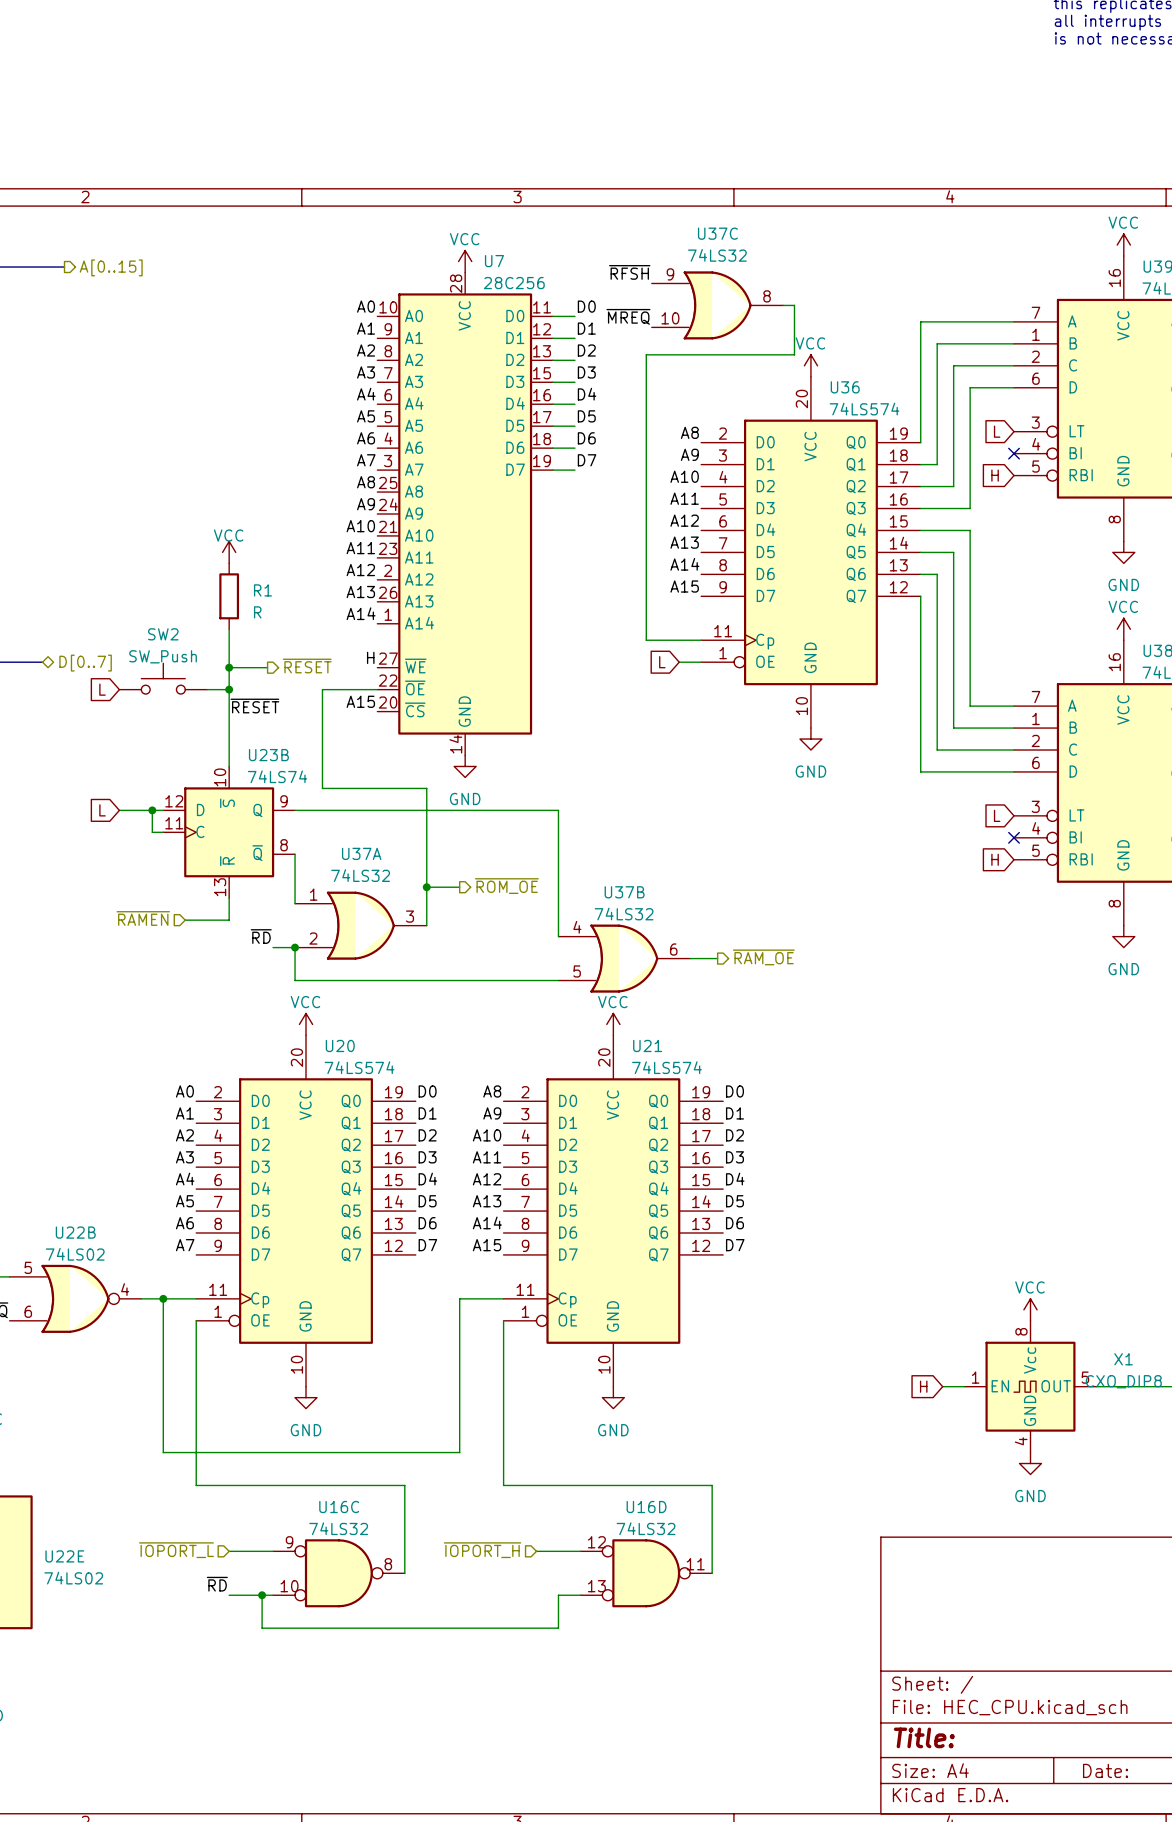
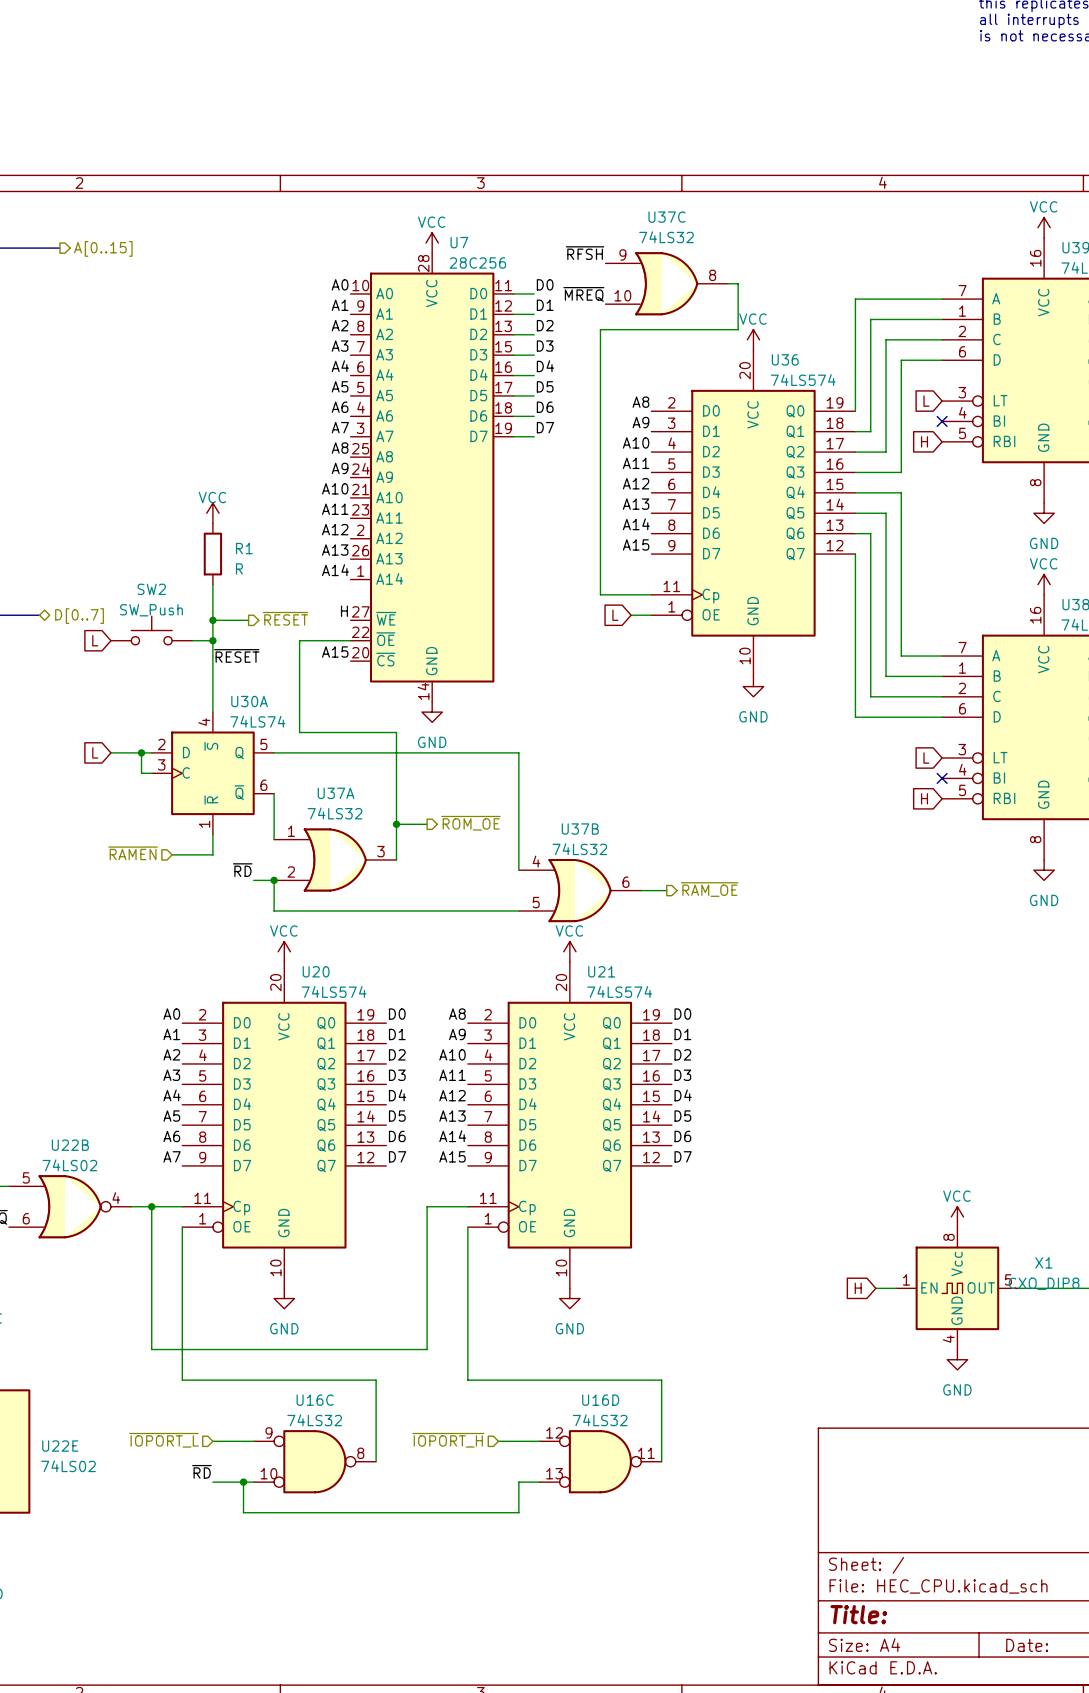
U23B name: U23B (268, 755) -> U30A (249, 701)
U23B pin number: 10 (220, 777) -> 4 (204, 722)
U23B pin number: 12 (174, 801) -> 2 (161, 744)
U23B pin number: 9 (284, 801) -> 5 (263, 744)
U23B pin number: 11 (174, 823) -> 3 (161, 764)
U23B pin number: 8 (284, 845) -> 6 (263, 785)
U23B pin number: 13 (220, 887) -> 1 (204, 824)

